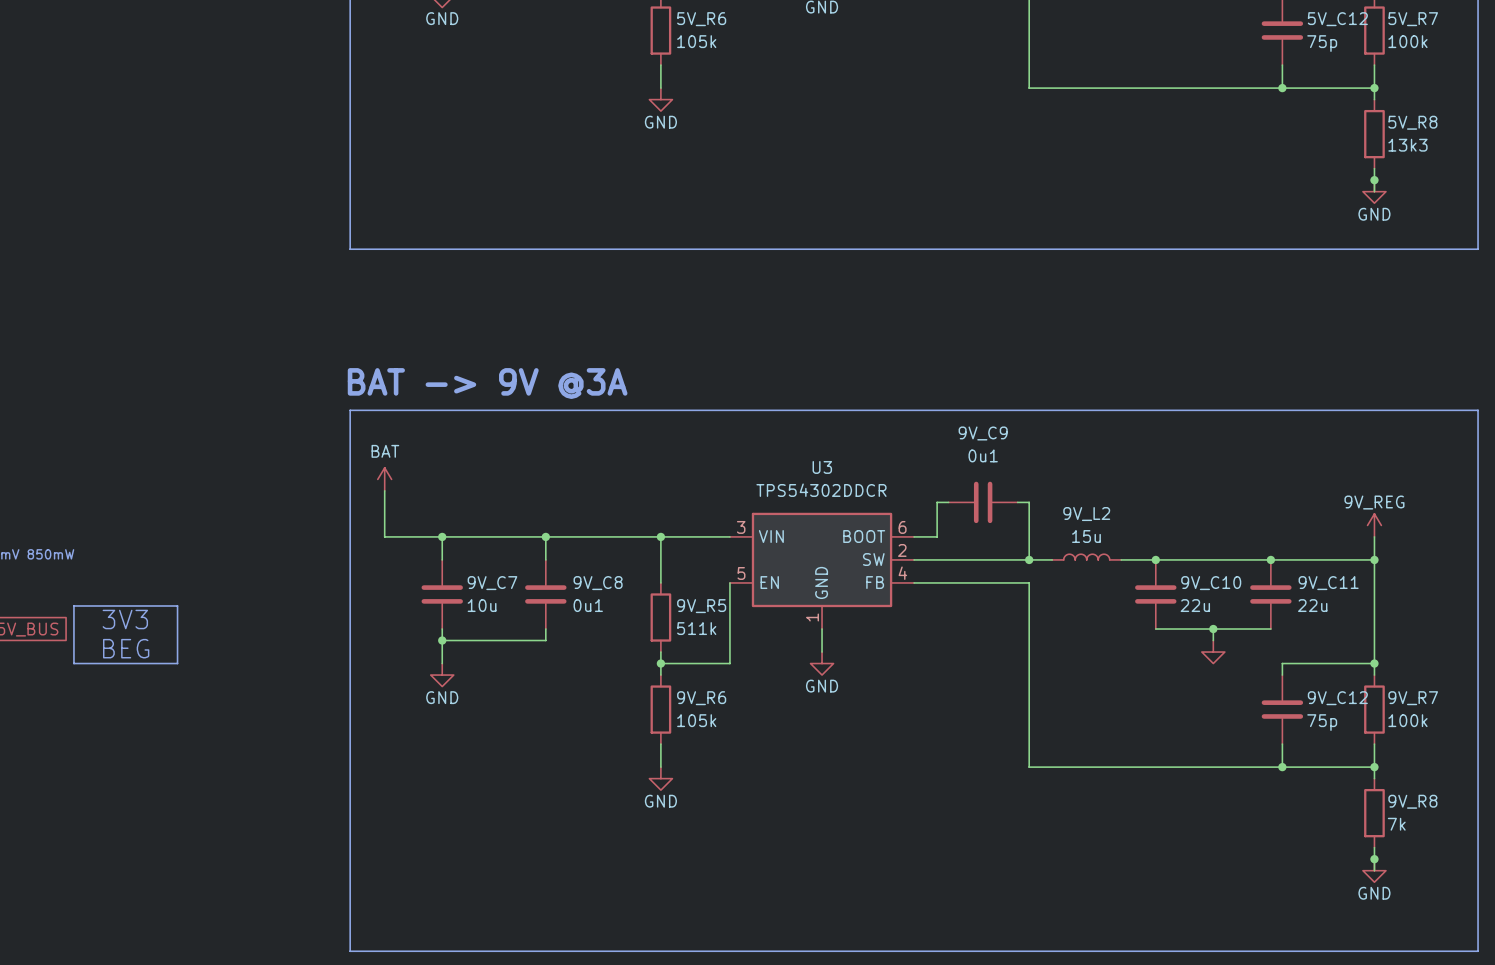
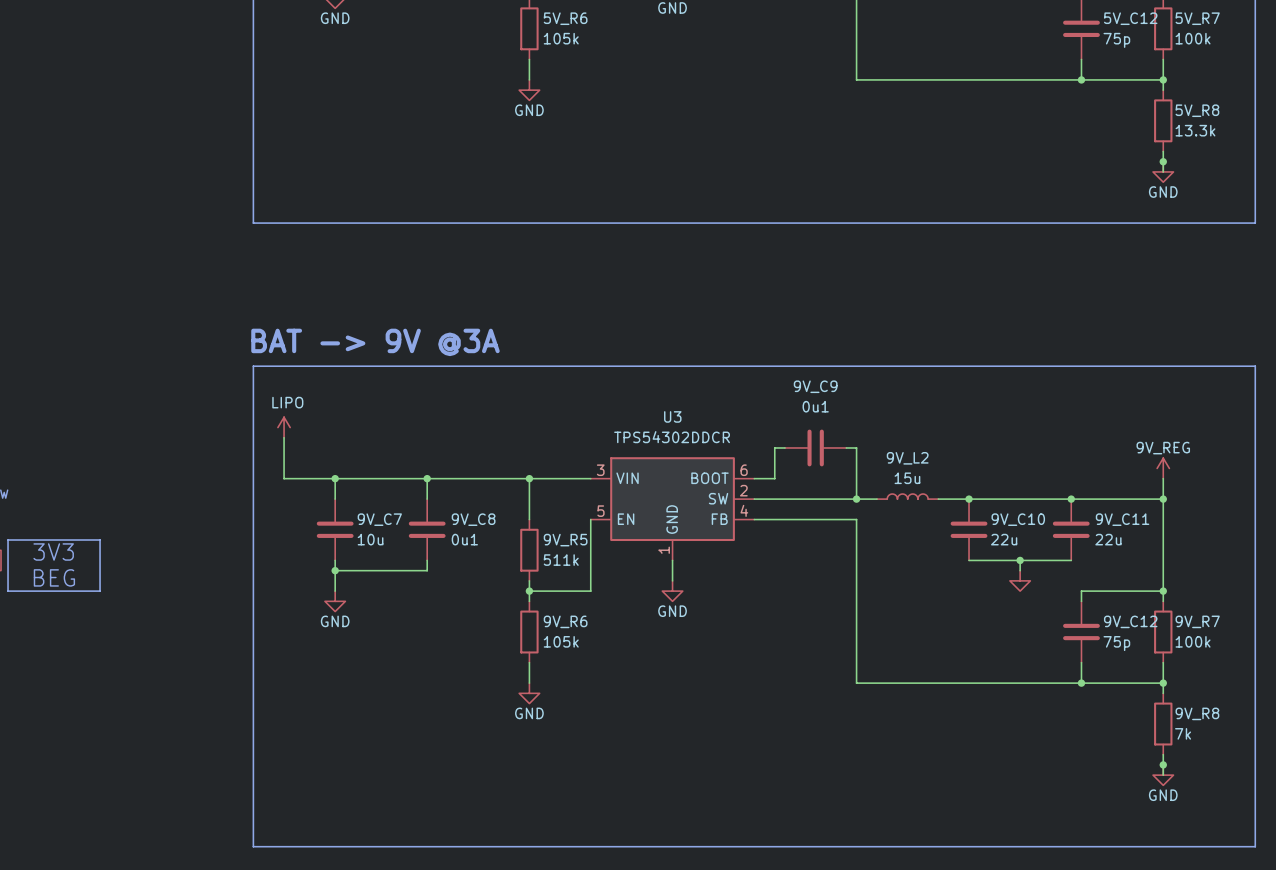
5V_R8 value: 13k3 (1407, 145) -> 13.3k (1195, 130)
power symbol: BAT (384, 479) -> LIPO (284, 427)

